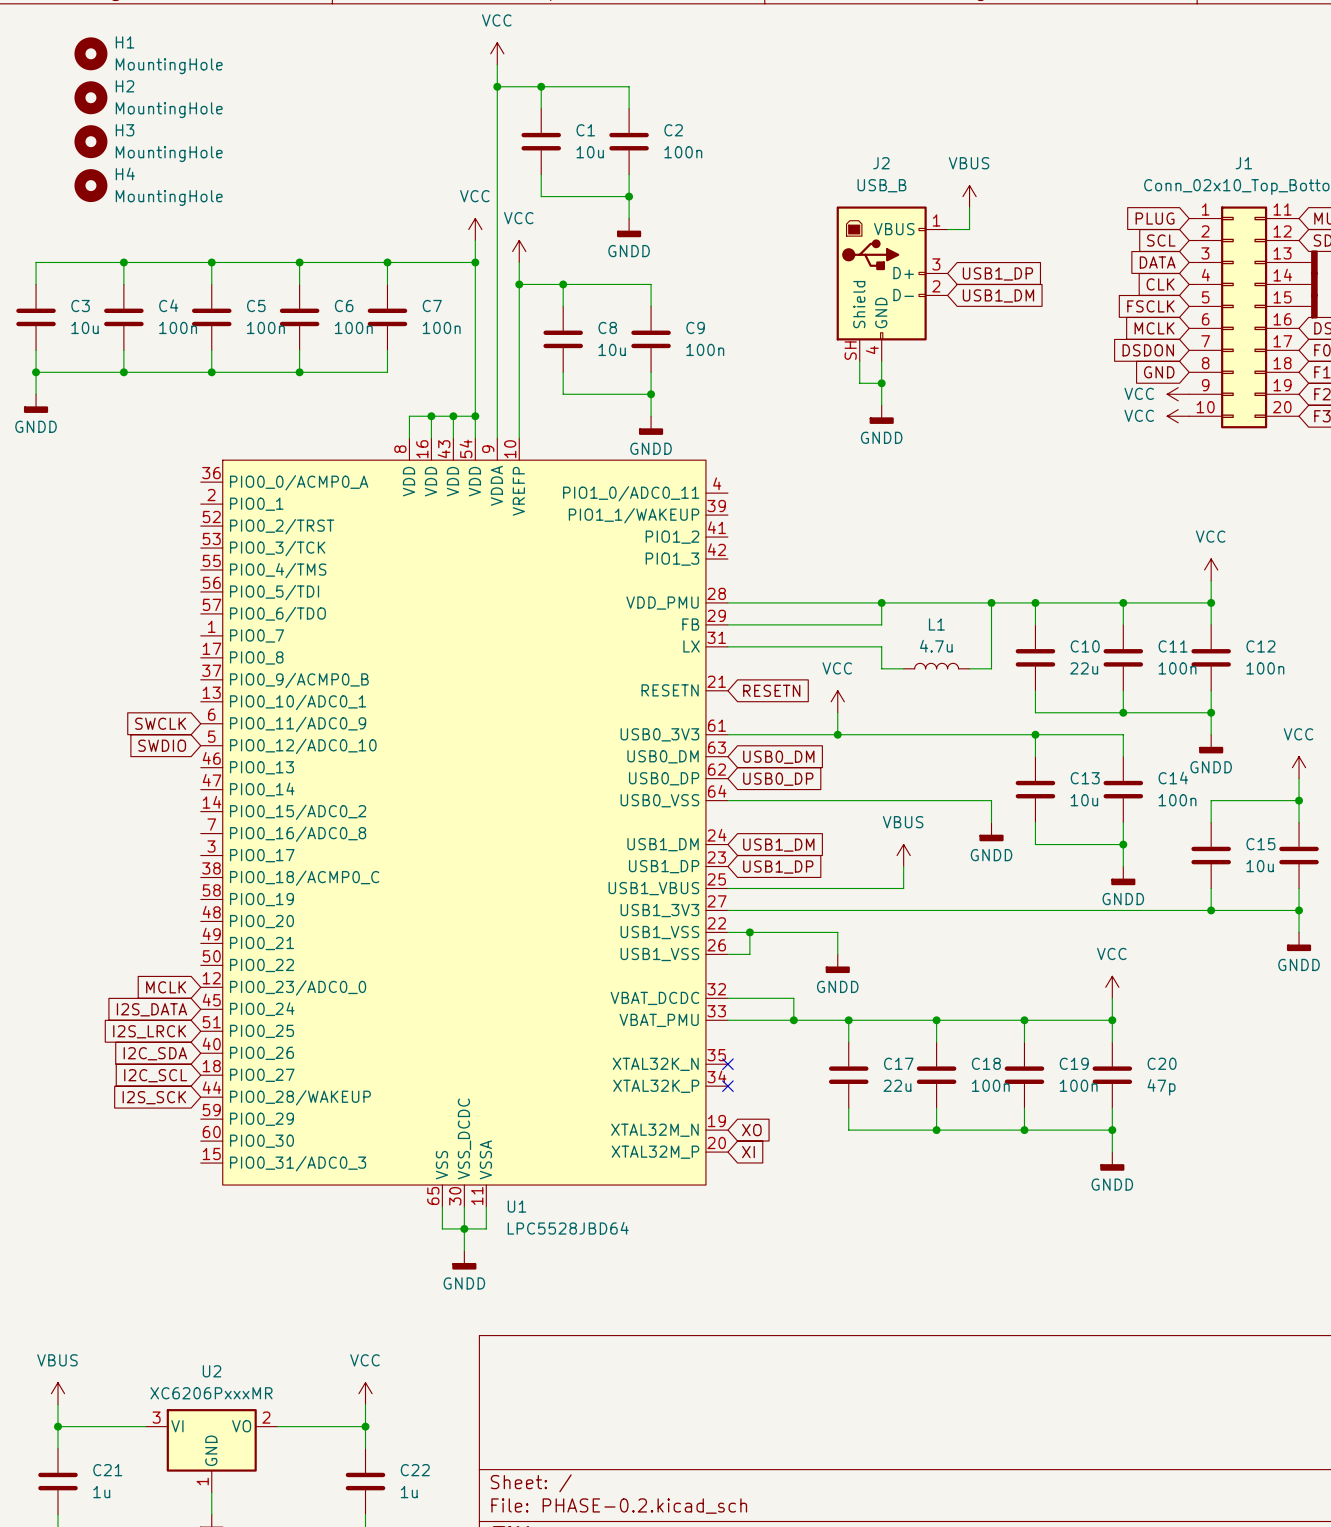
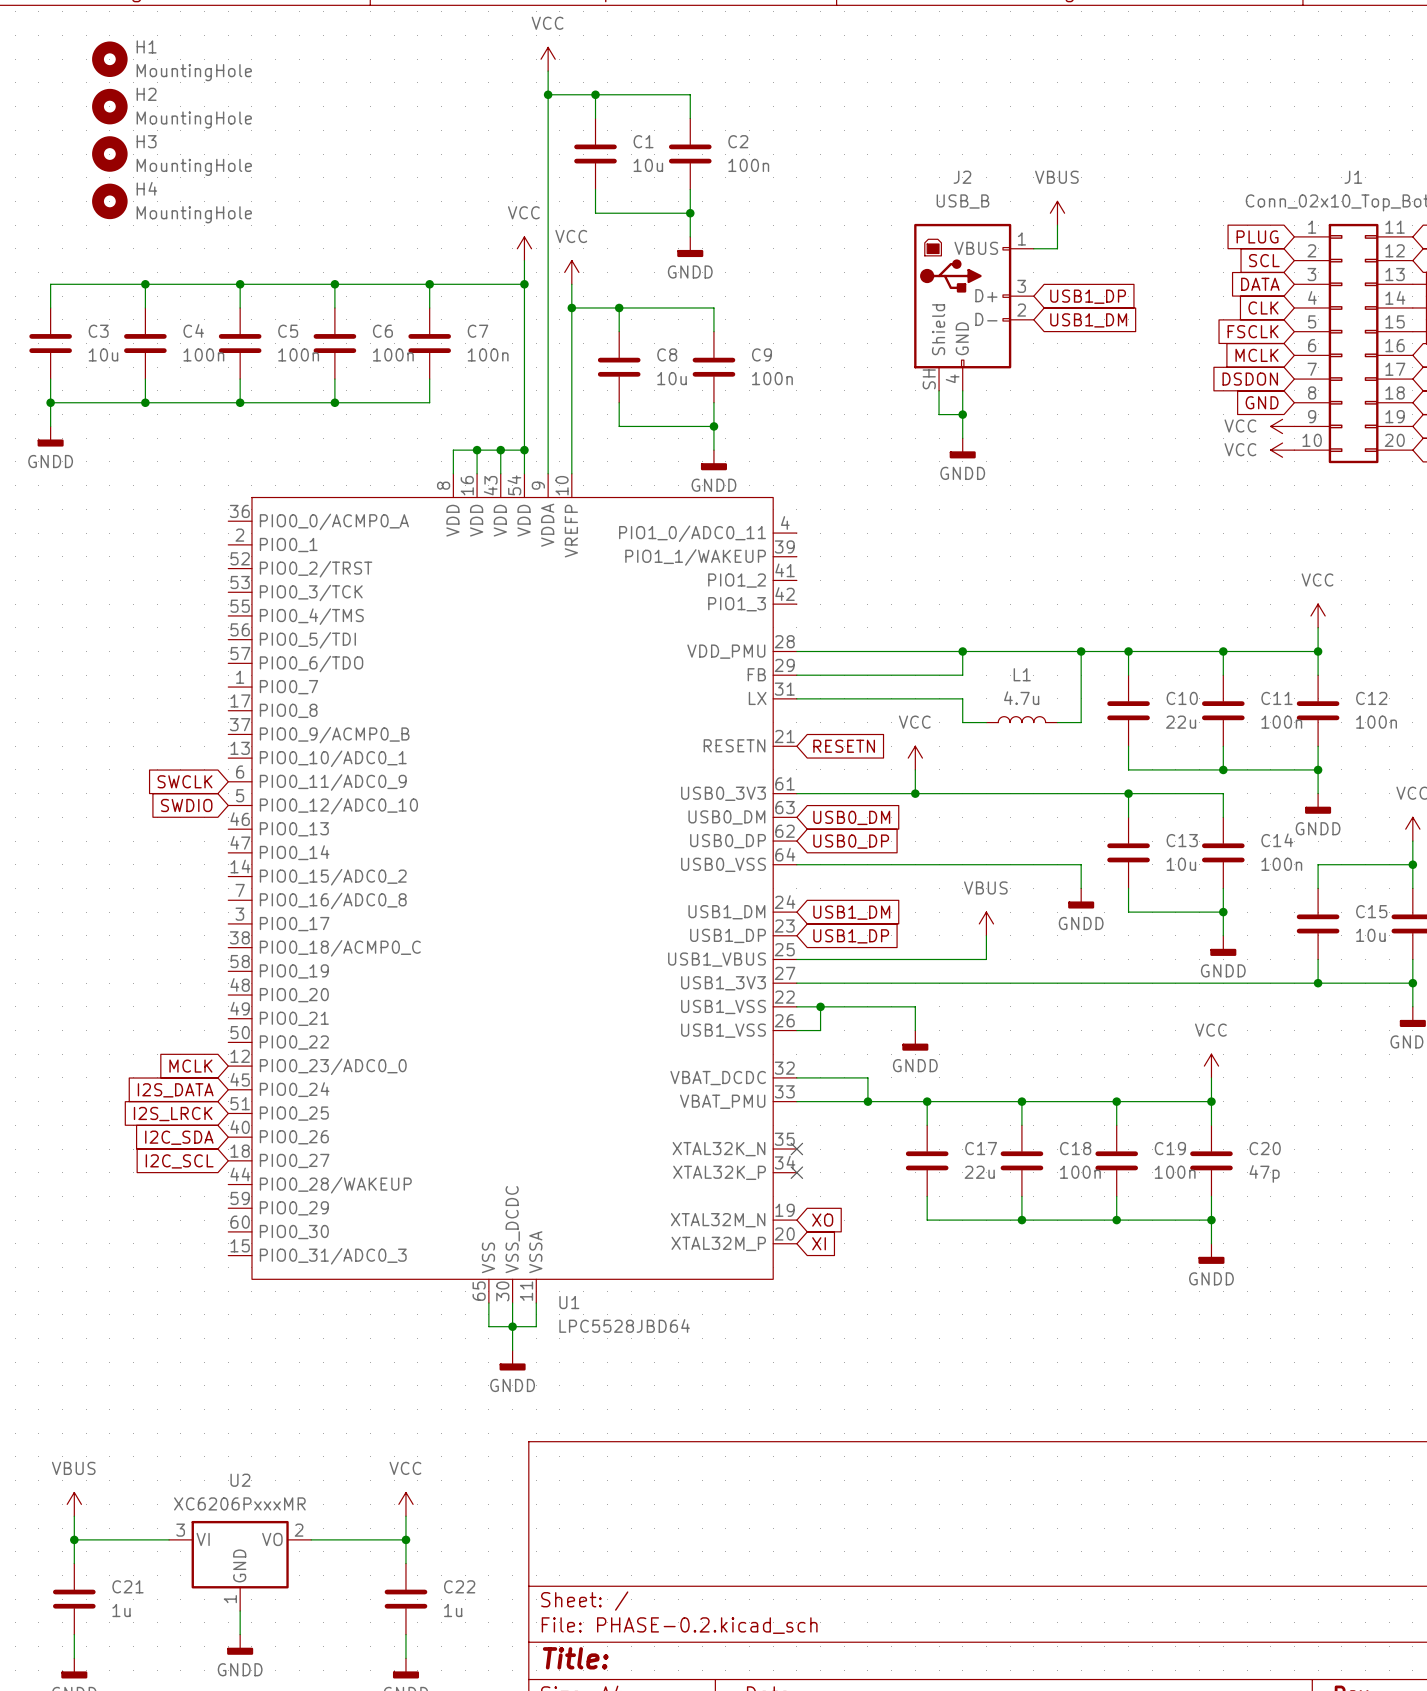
global label: I2S_SCK (154, 1097) -> none

